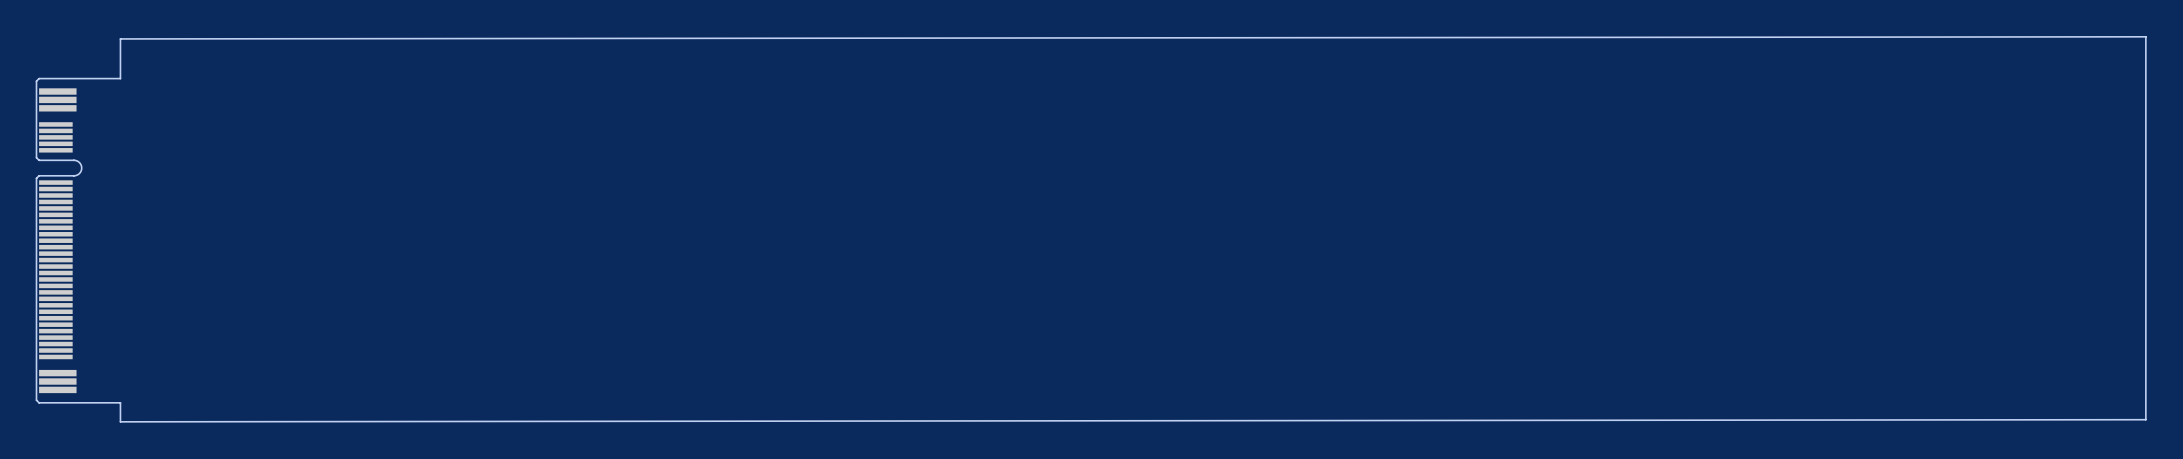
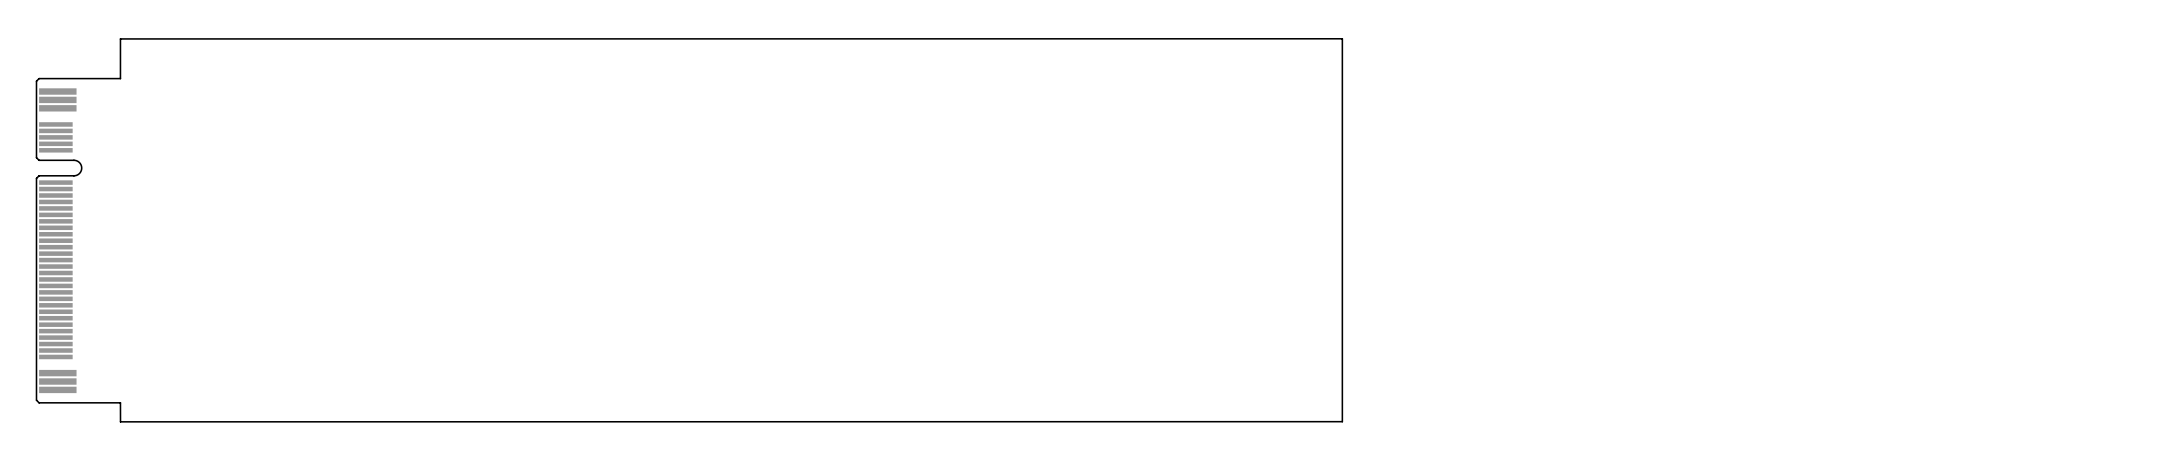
board edge: (120, 38) (2145, 36) (2145, 419) (120, 421) (120, 402) -> (120, 38) (1342, 38) (1342, 421) (120, 421) (120, 402)

